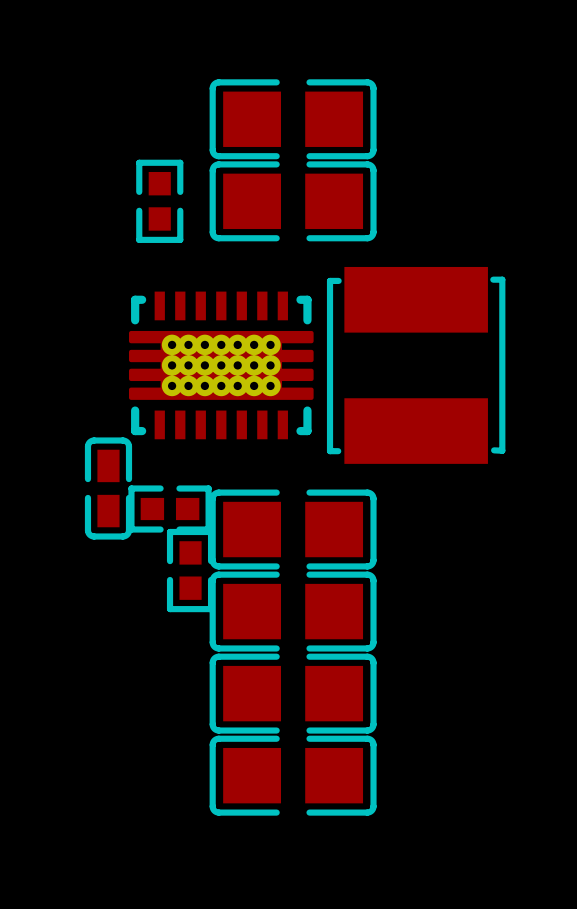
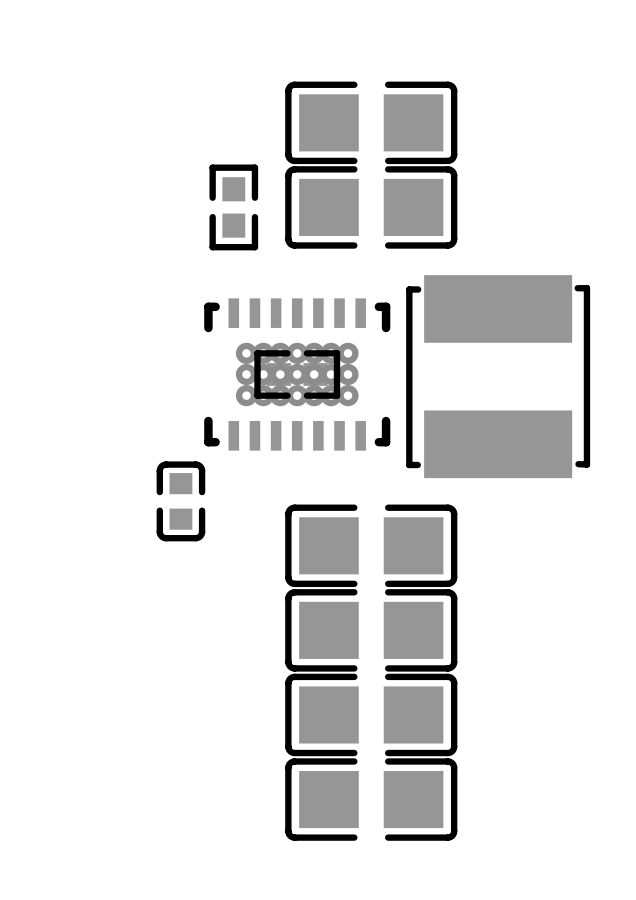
part footprint: [129, 291, 314, 452] -> [204, 298, 391, 464]
part: none -> (297, 374)
part footprint: [84, 437, 133, 540] -> [156, 461, 206, 542]
part: (170, 509) -> none
part: (190, 570) -> none

